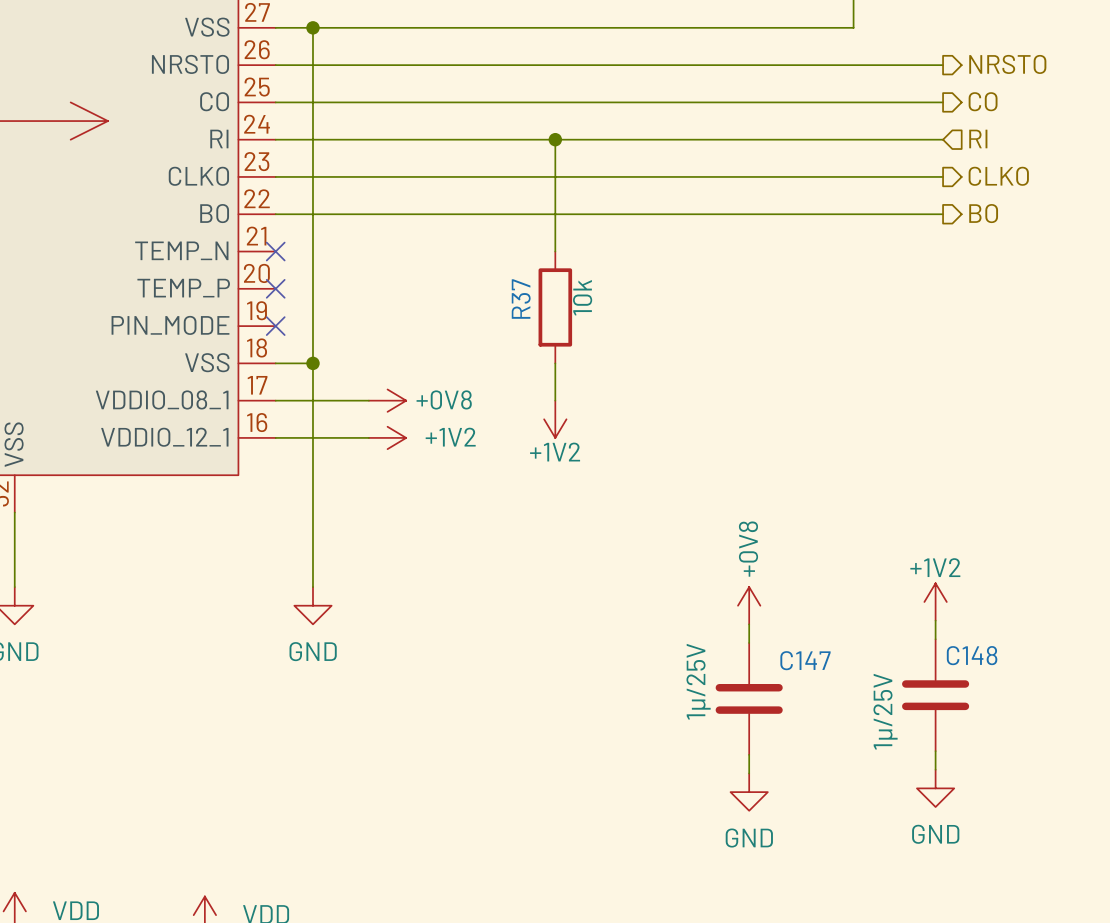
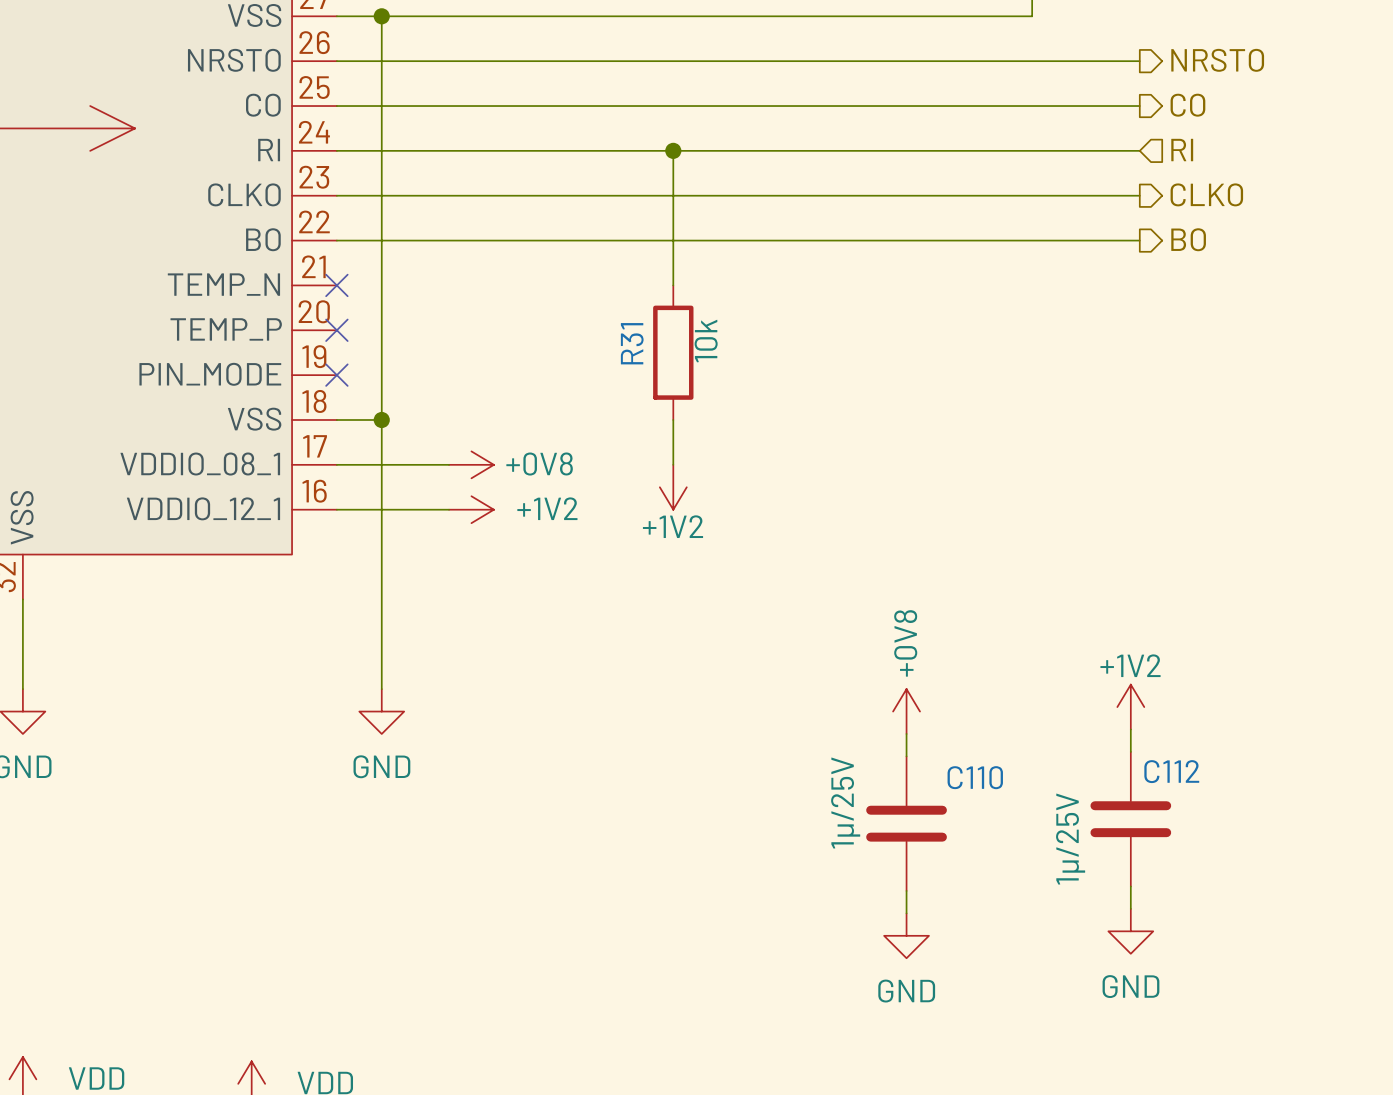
R37 name: R37 (521, 299) -> R31 (632, 343)
C148 name: C148 (972, 655) -> C112 (1171, 771)
C147 name: C147 (805, 660) -> C110 (975, 777)

